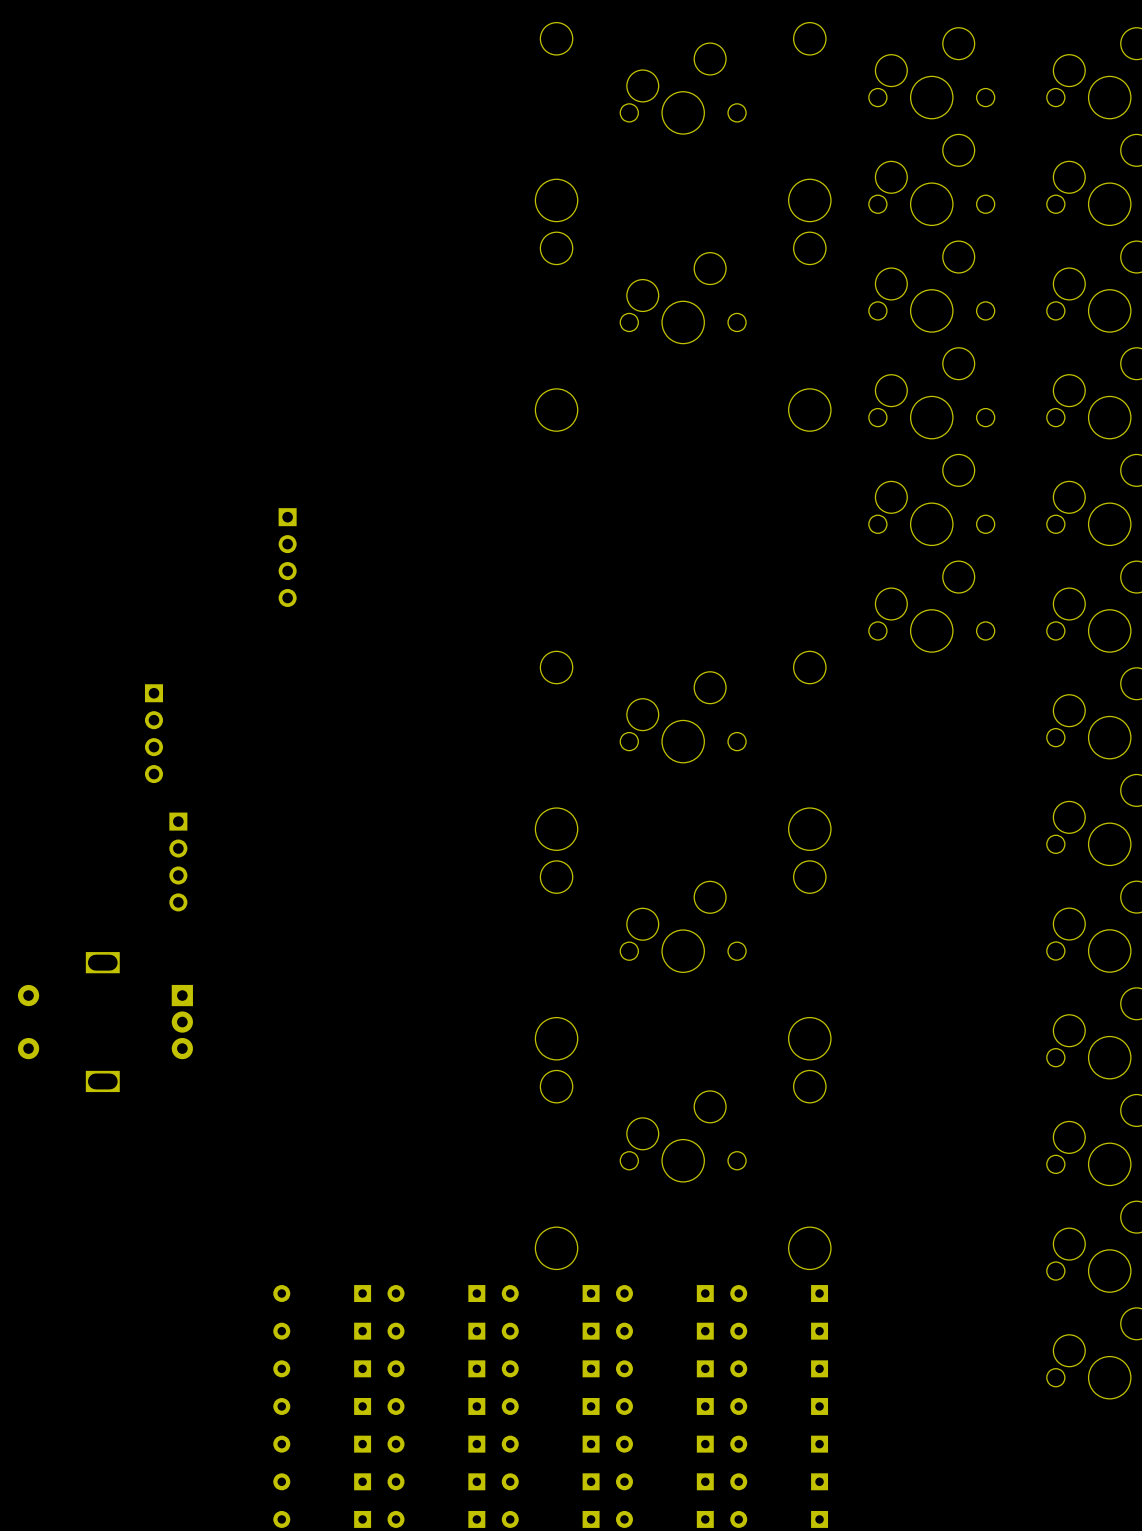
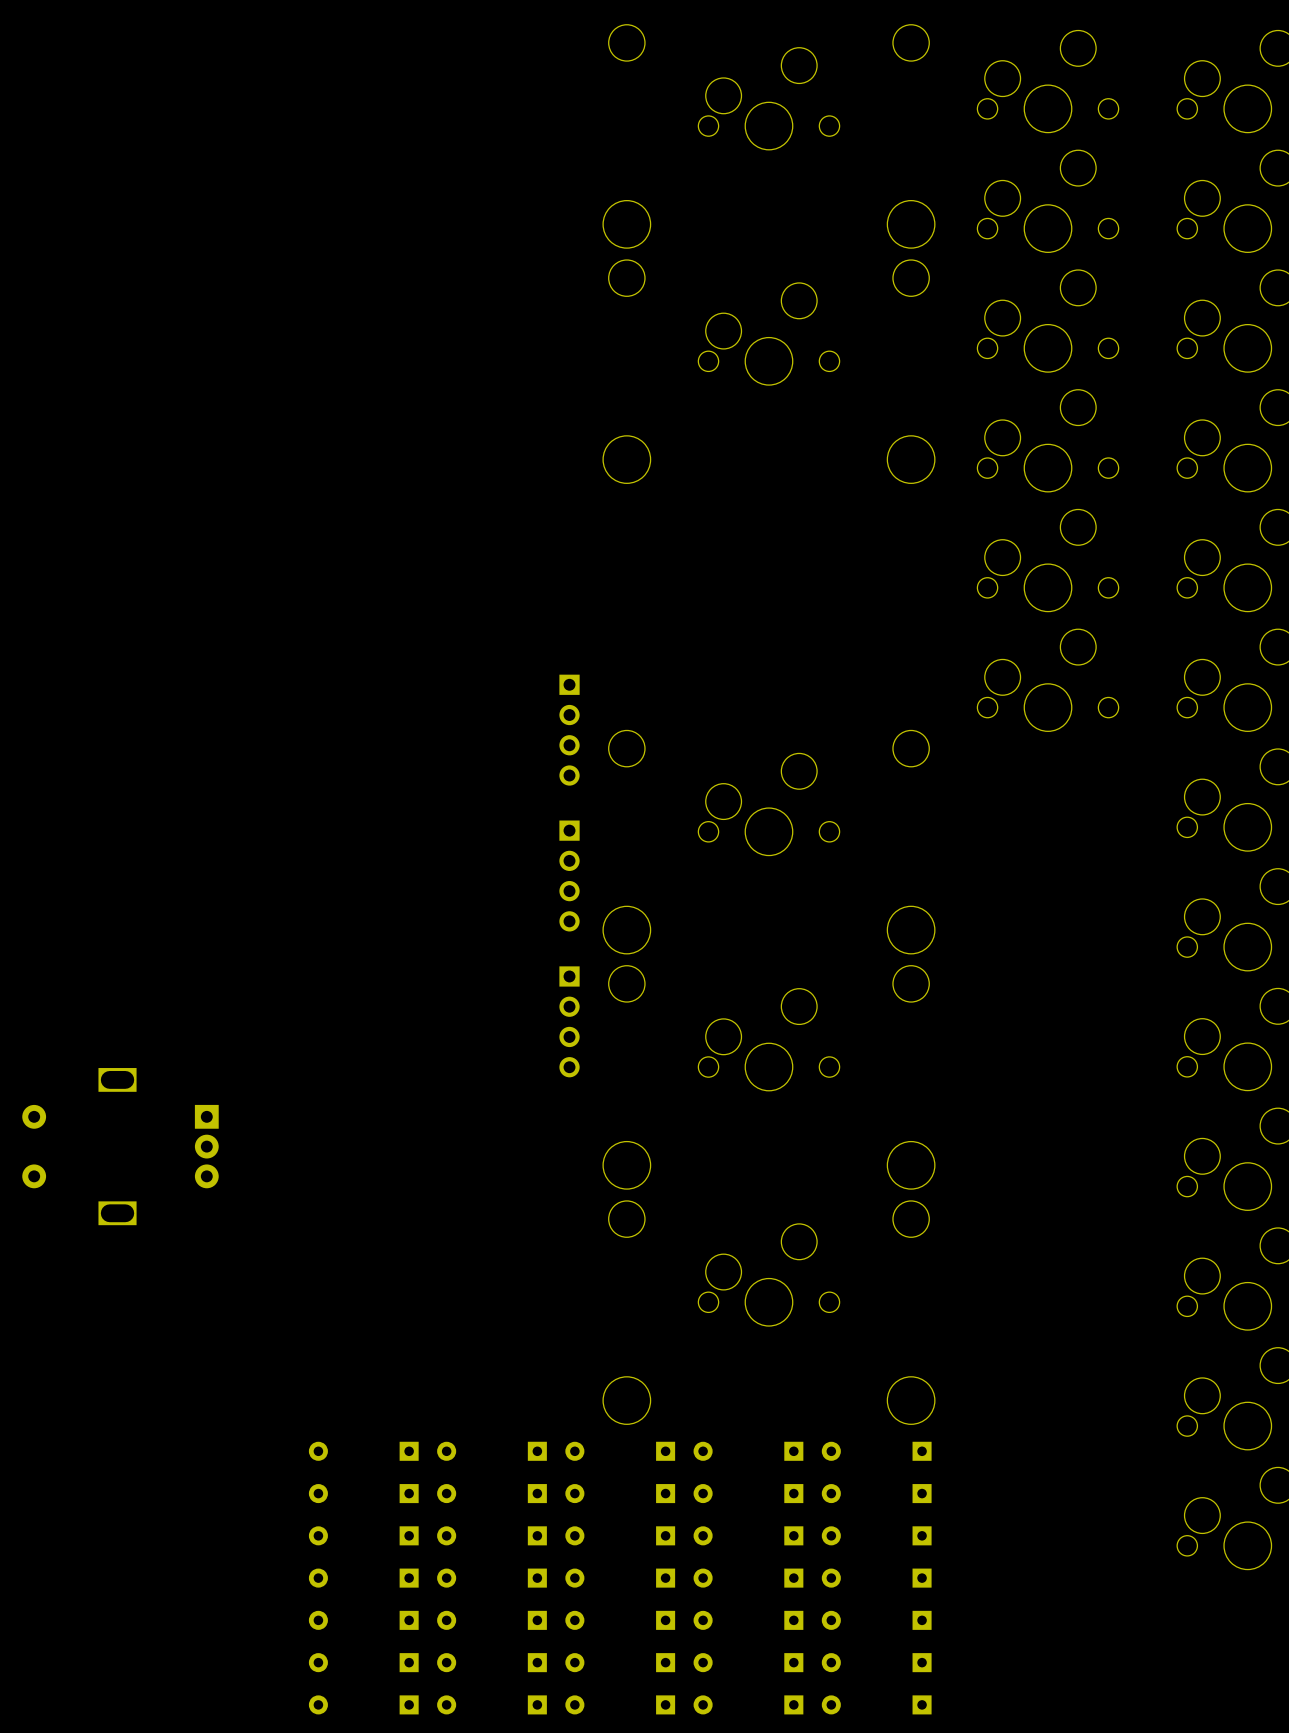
part: (287, 557) -> none
part: none -> (569, 730)
part: (153, 733) -> none
part: none -> (569, 875)
part: (178, 862) -> none
part: none -> (569, 1021)

